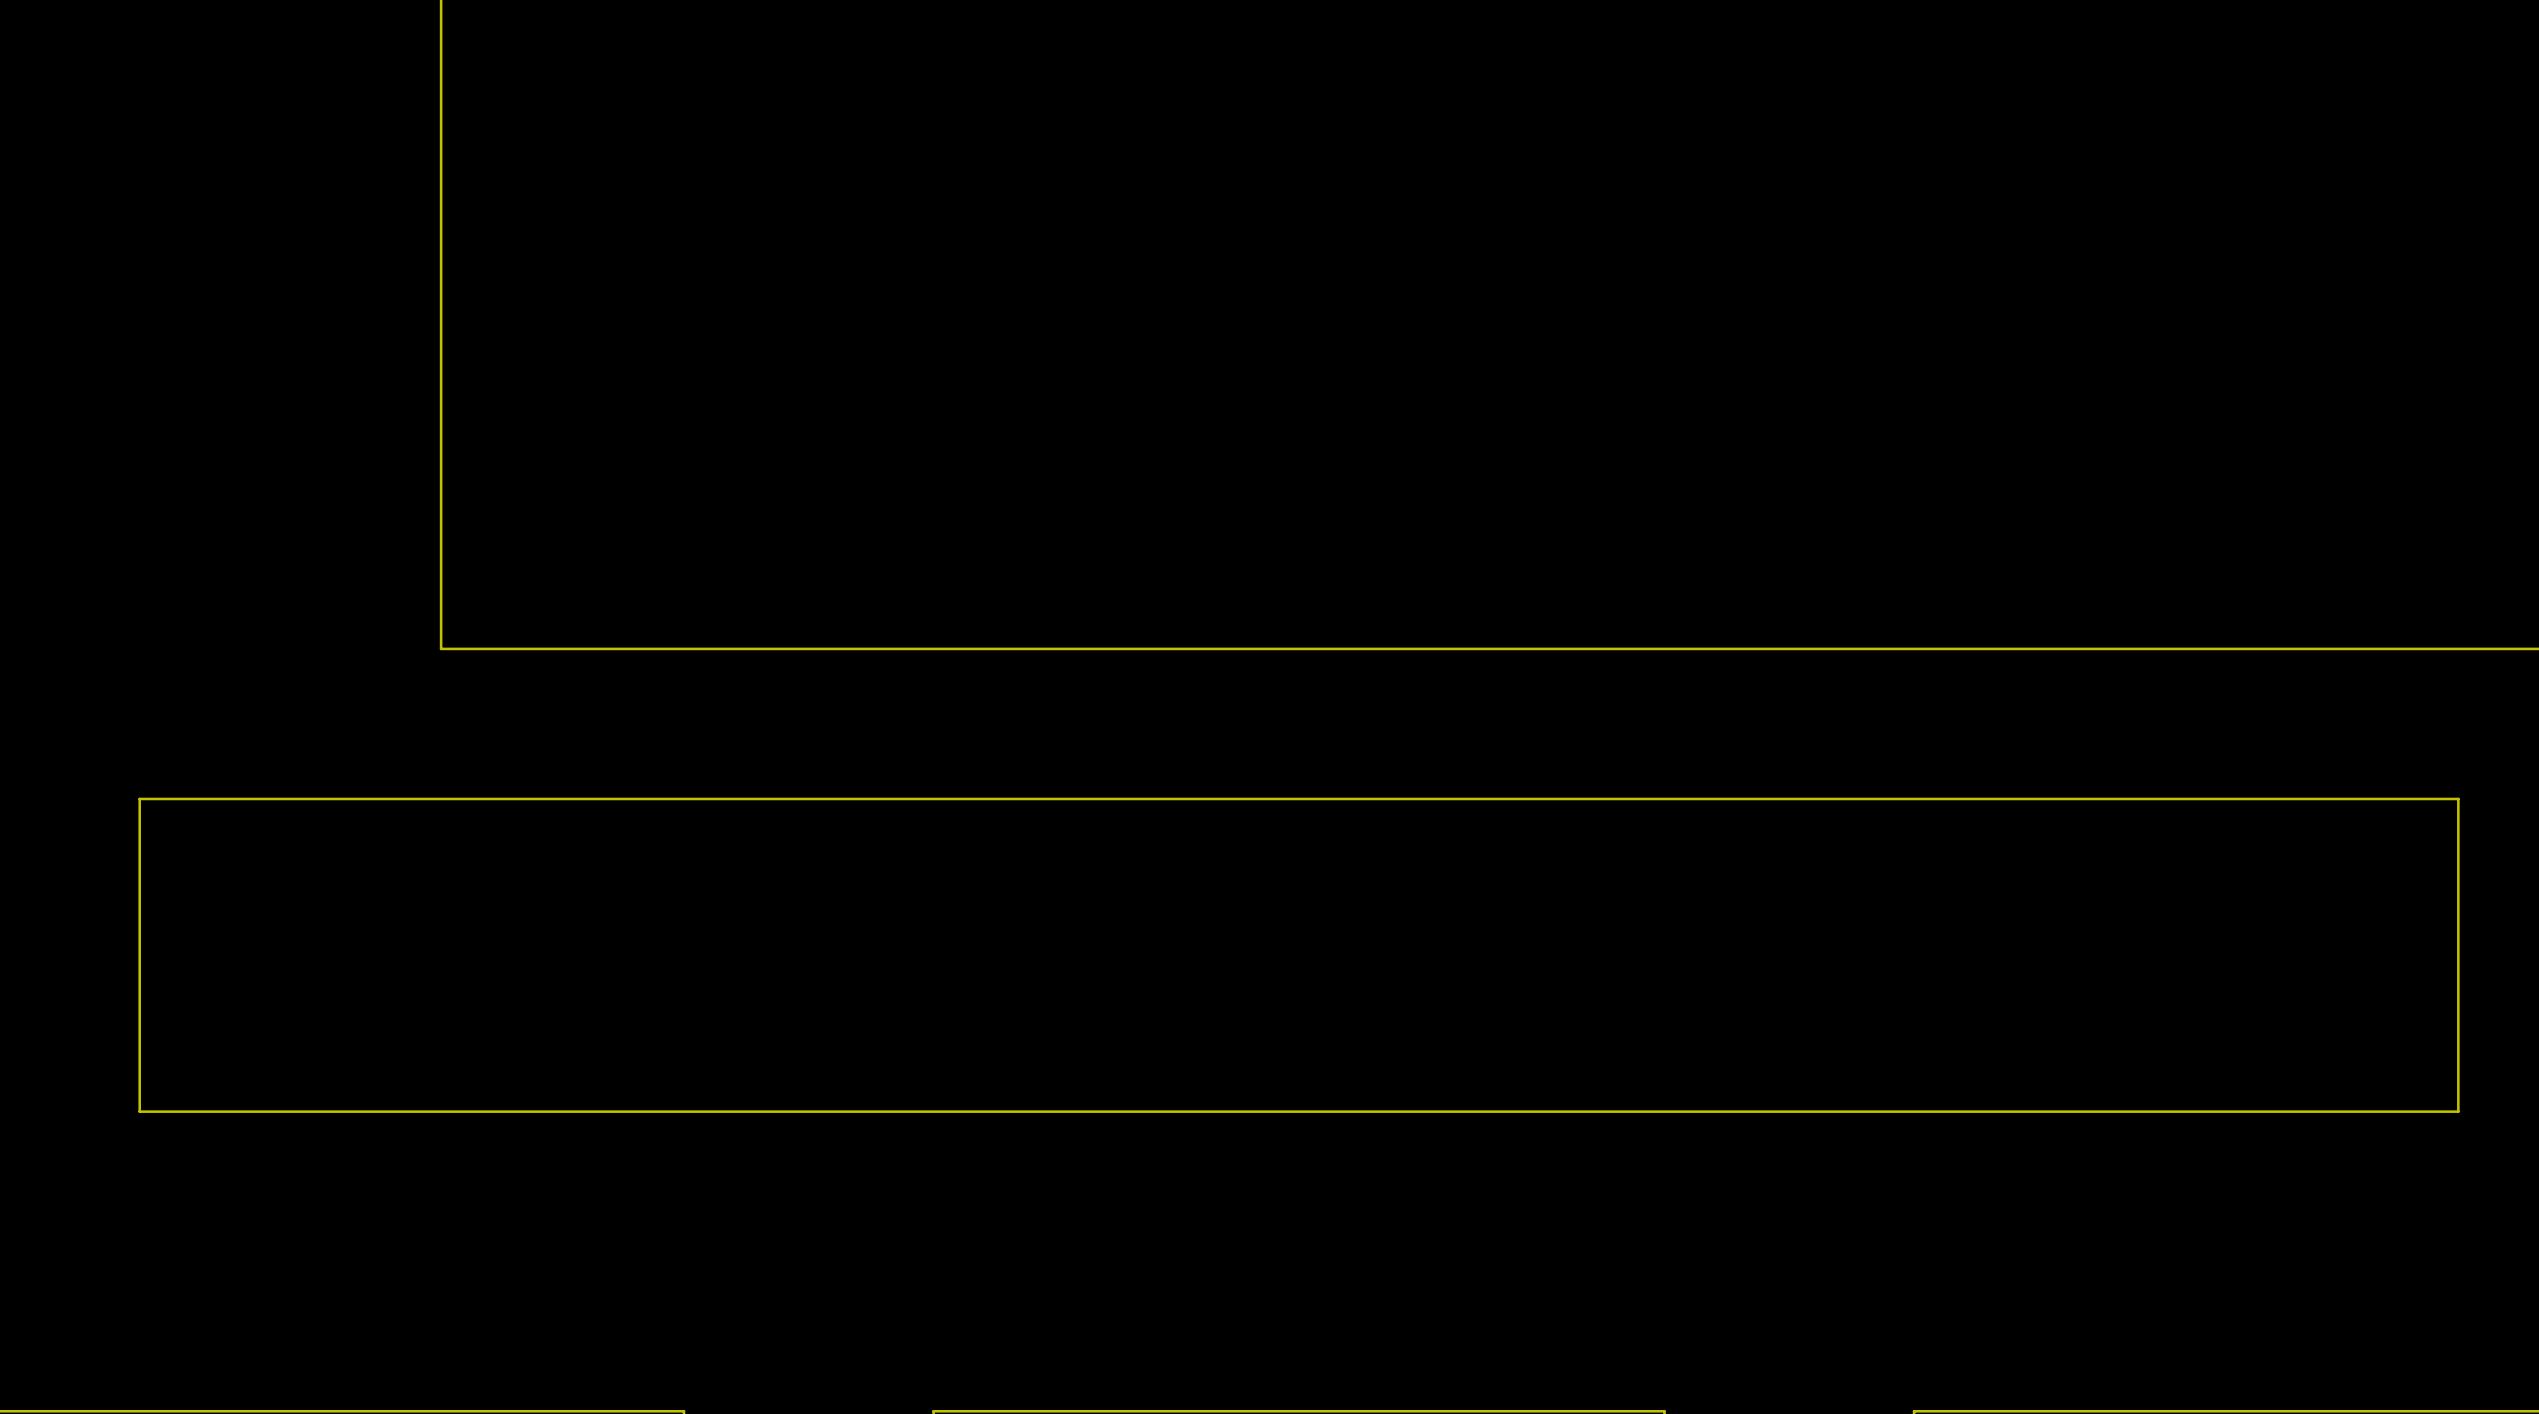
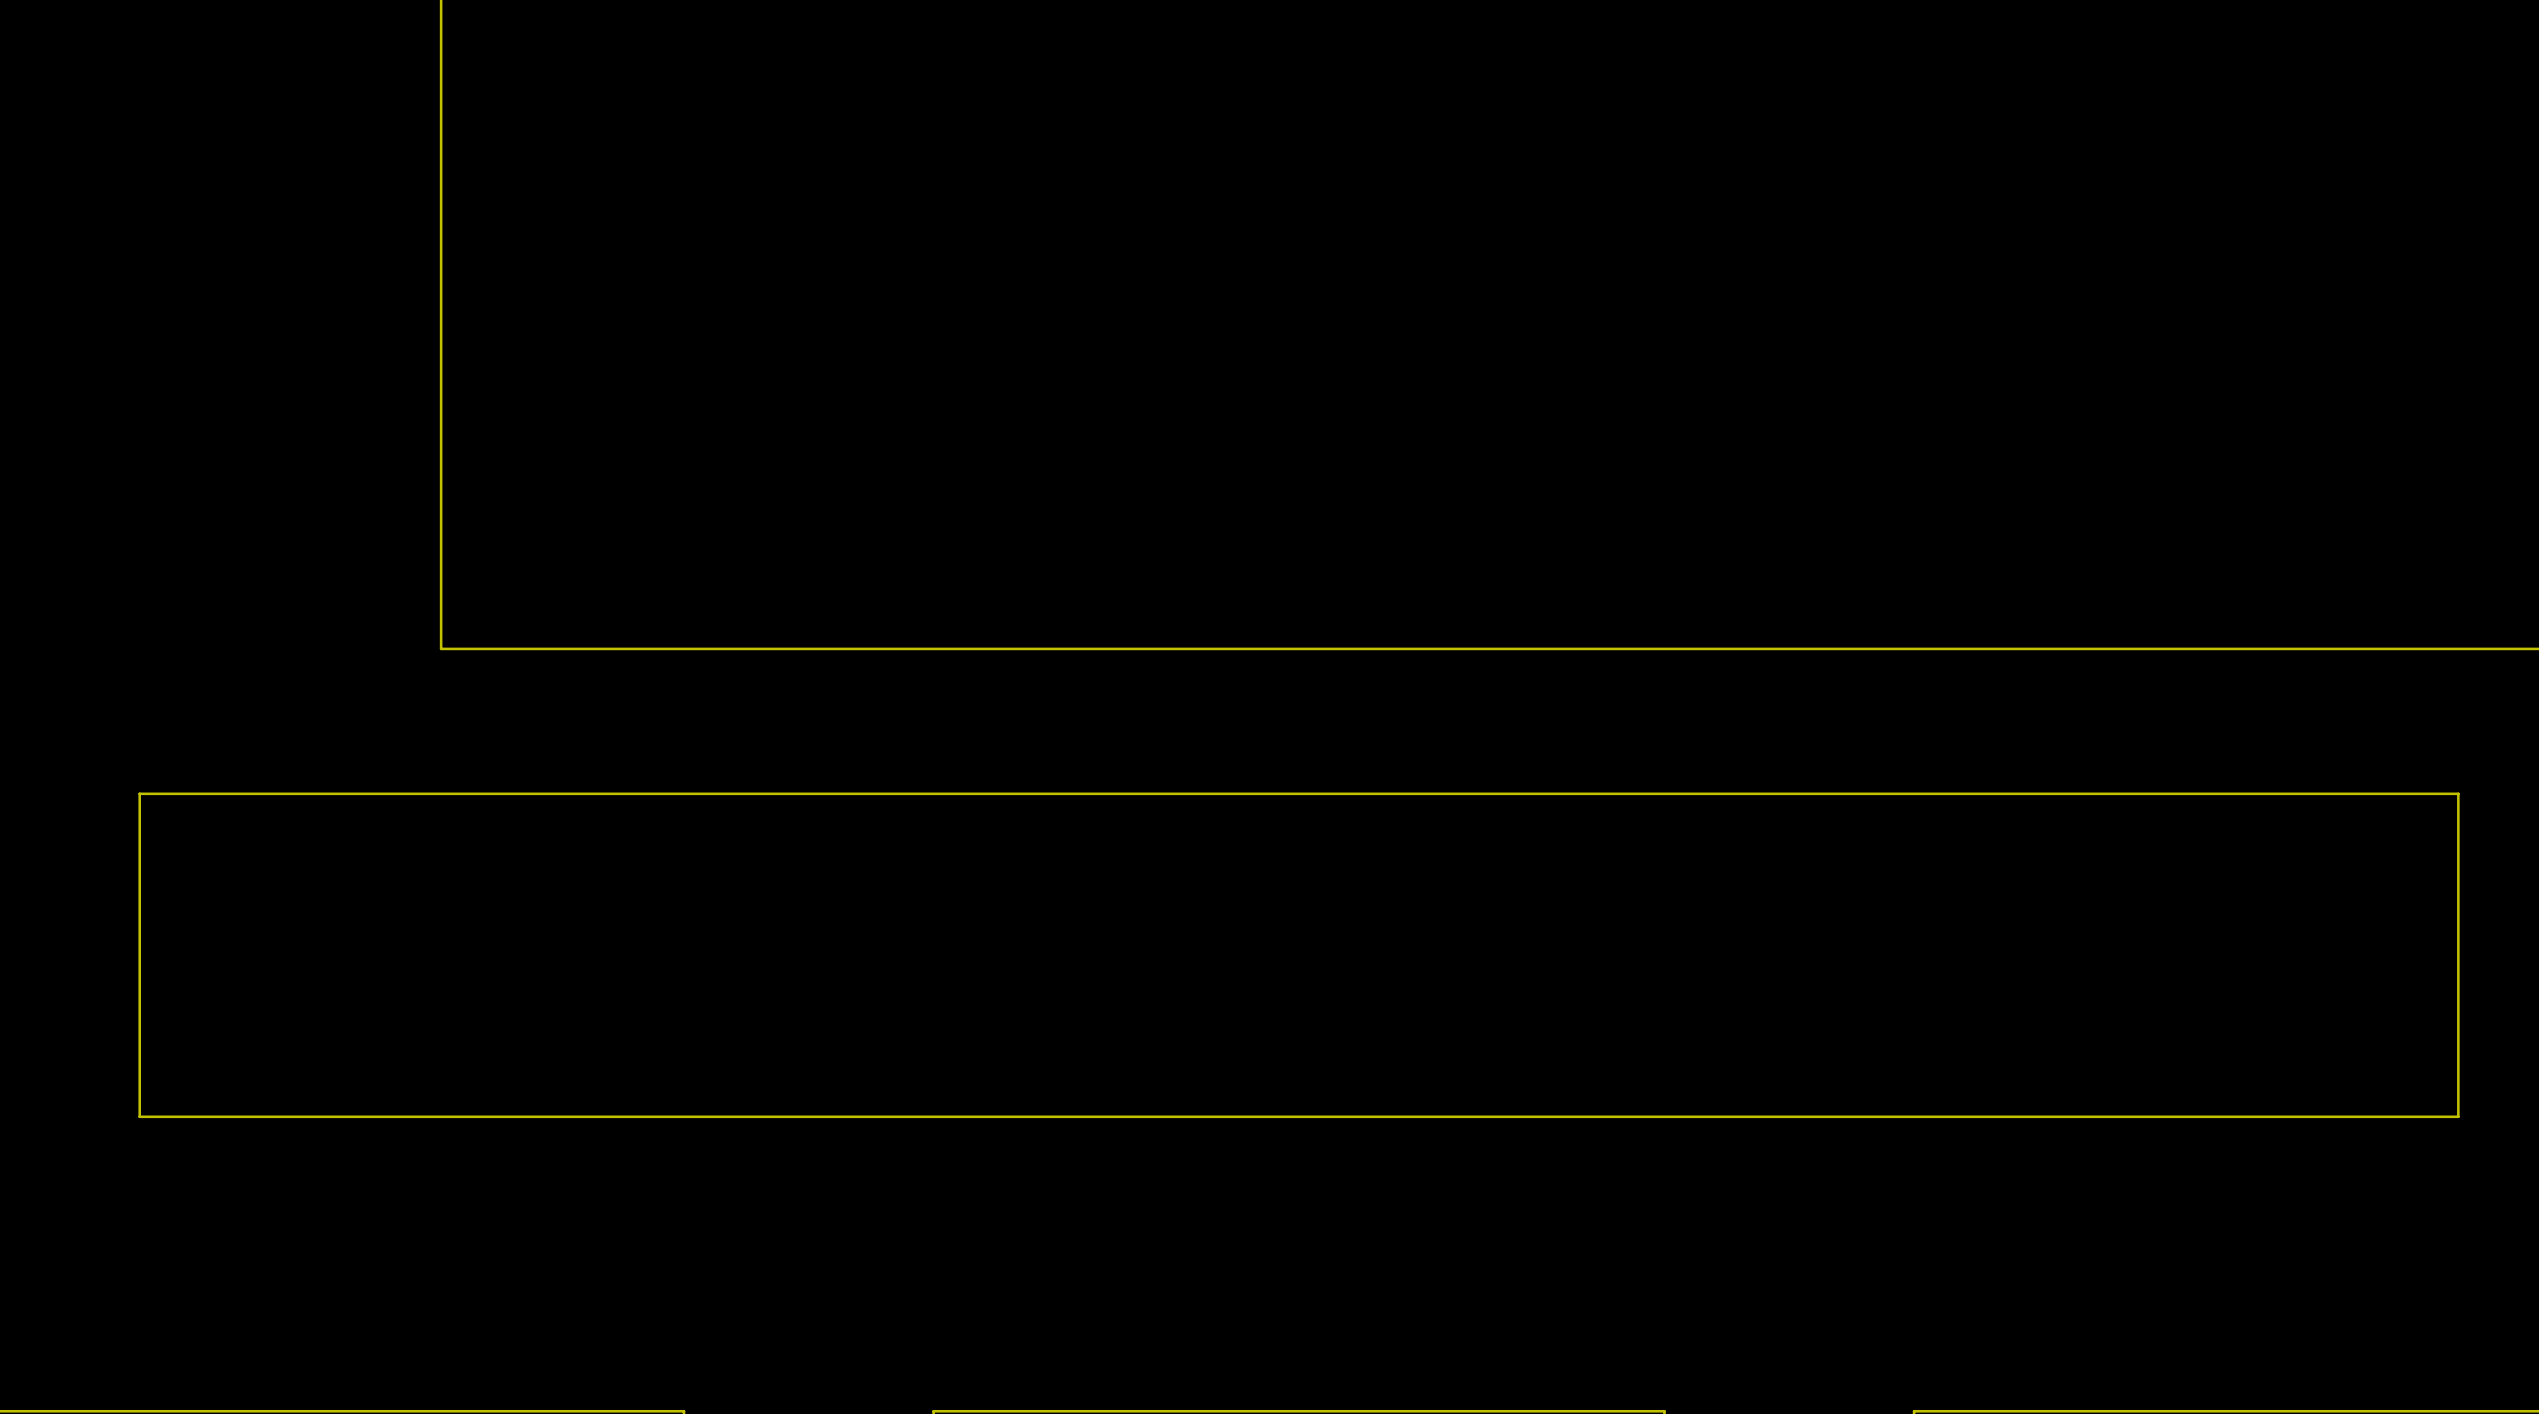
drawing shape: [138, 797, 2460, 1113] -> [138, 792, 2460, 1119]

